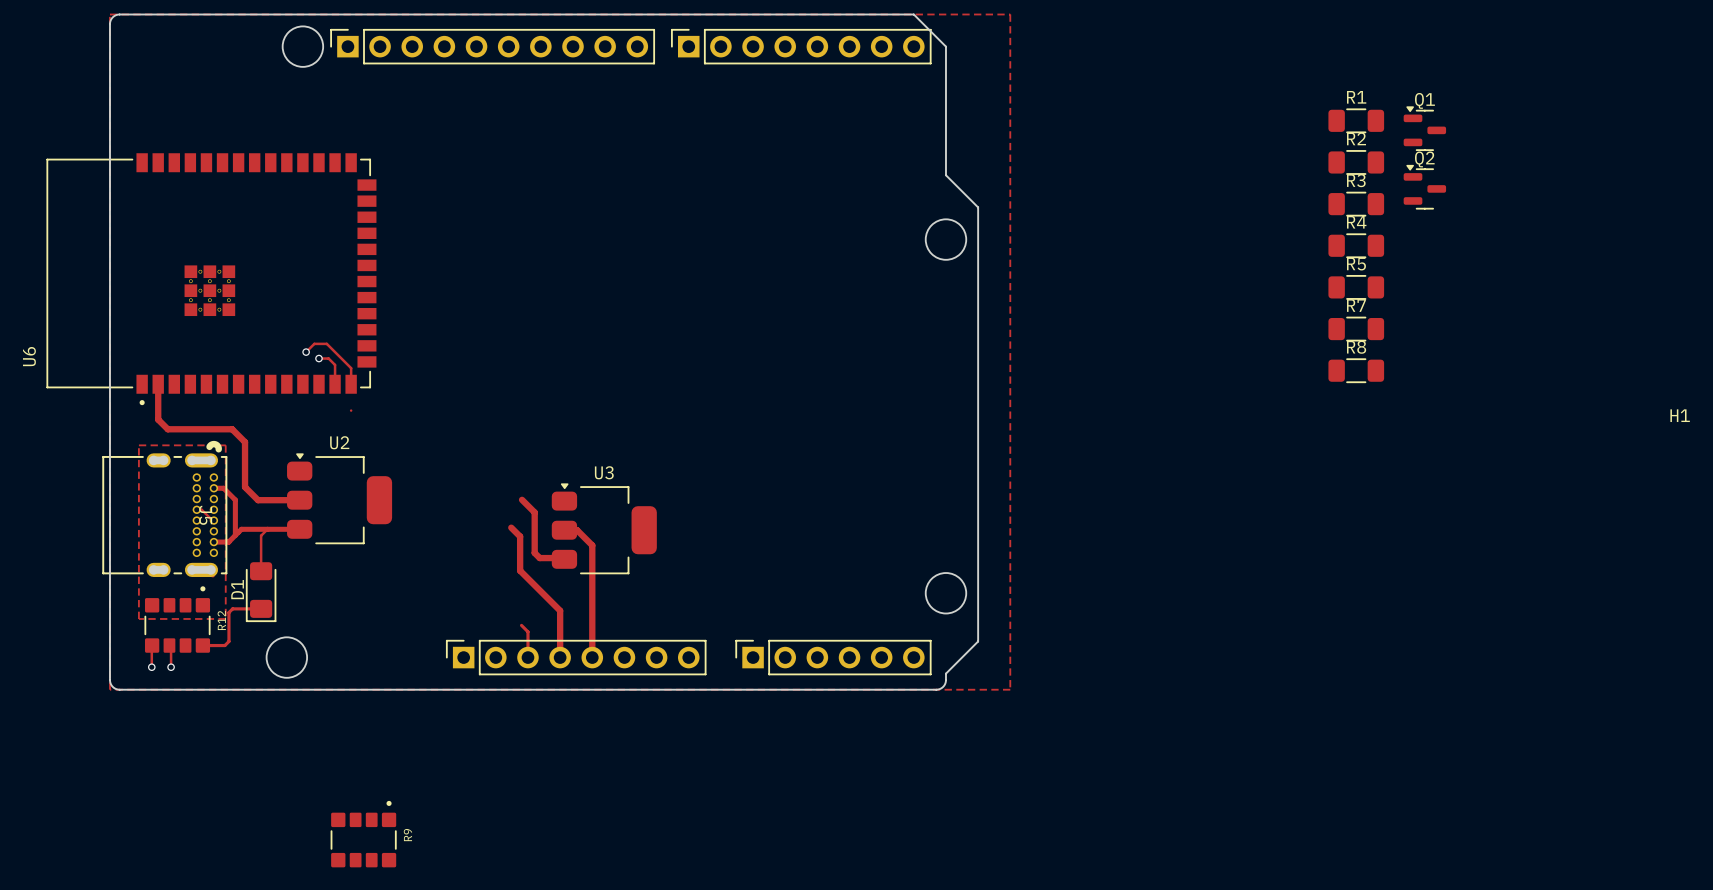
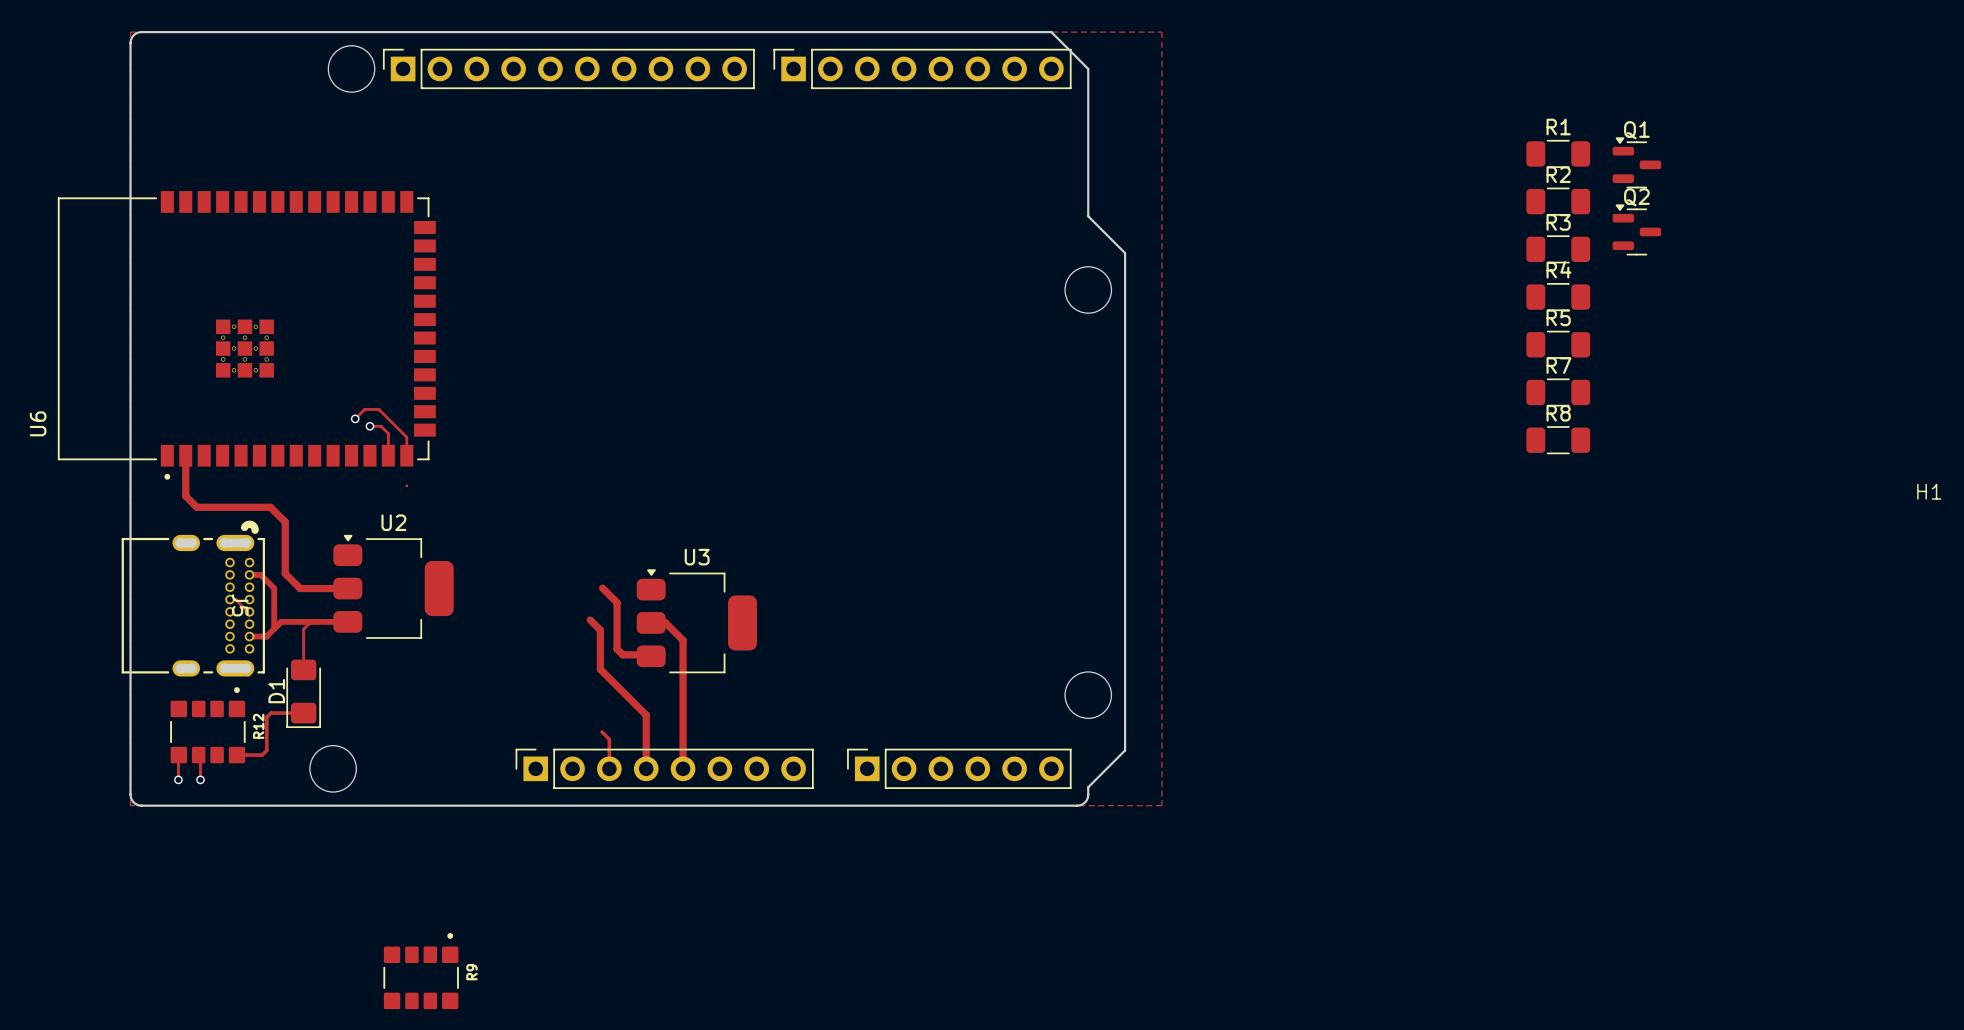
zone outline: (138, 445) (225, 445) (225, 618) (138, 618) (138, 445) -> none

